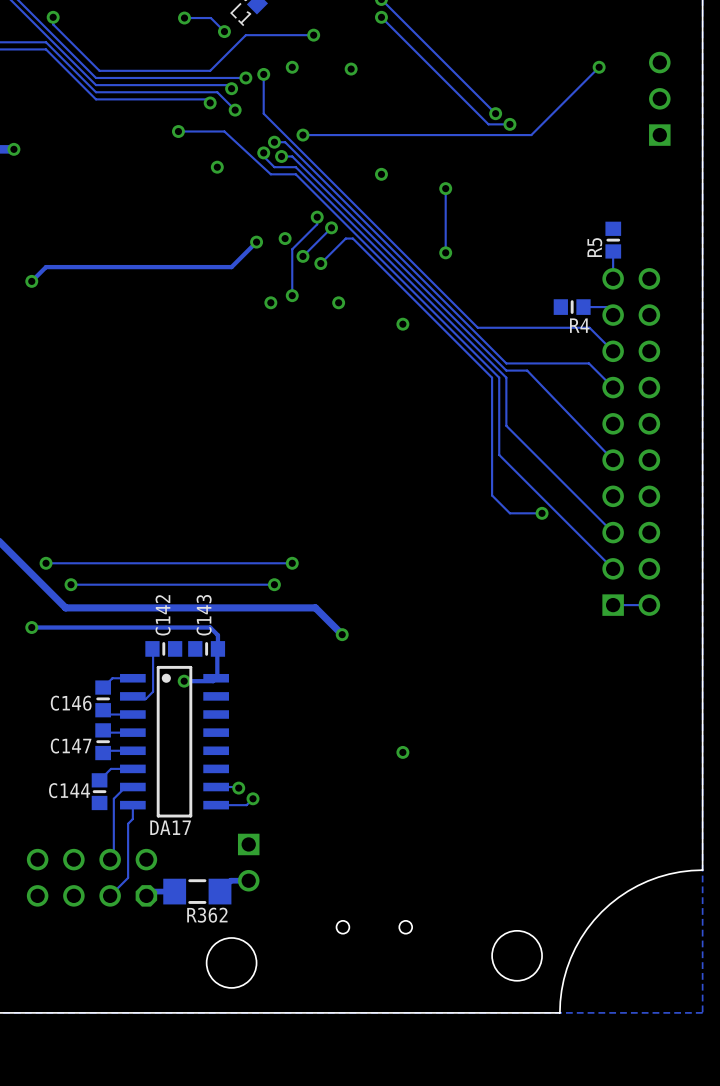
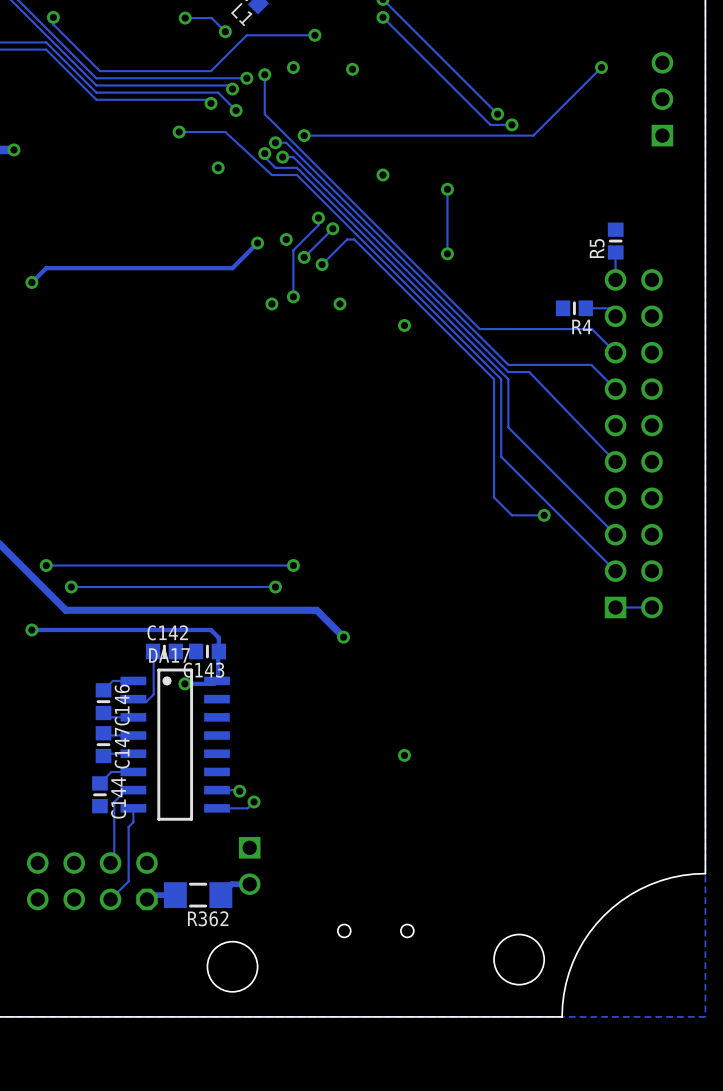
C142 name rotation: 0° (163, 615) -> 90° clockwise (167, 632)
C143 name rotation: 0° (204, 615) -> 90° clockwise (203, 670)
C143 name position: C143 (204, 615) -> C143 (203, 670)
C146 name rotation: 0° (71, 703) -> 90° counterclockwise (122, 705)
C146 name position: C146 (71, 703) -> C146 (122, 705)
C147 name rotation: 0° (71, 746) -> 90° counterclockwise (122, 748)
C147 name position: C147 (71, 746) -> C147 (122, 748)
C144 name rotation: 0° (69, 790) -> 90° counterclockwise (118, 798)
DA17 name position: DA17 (170, 827) -> DA17 (169, 655)

